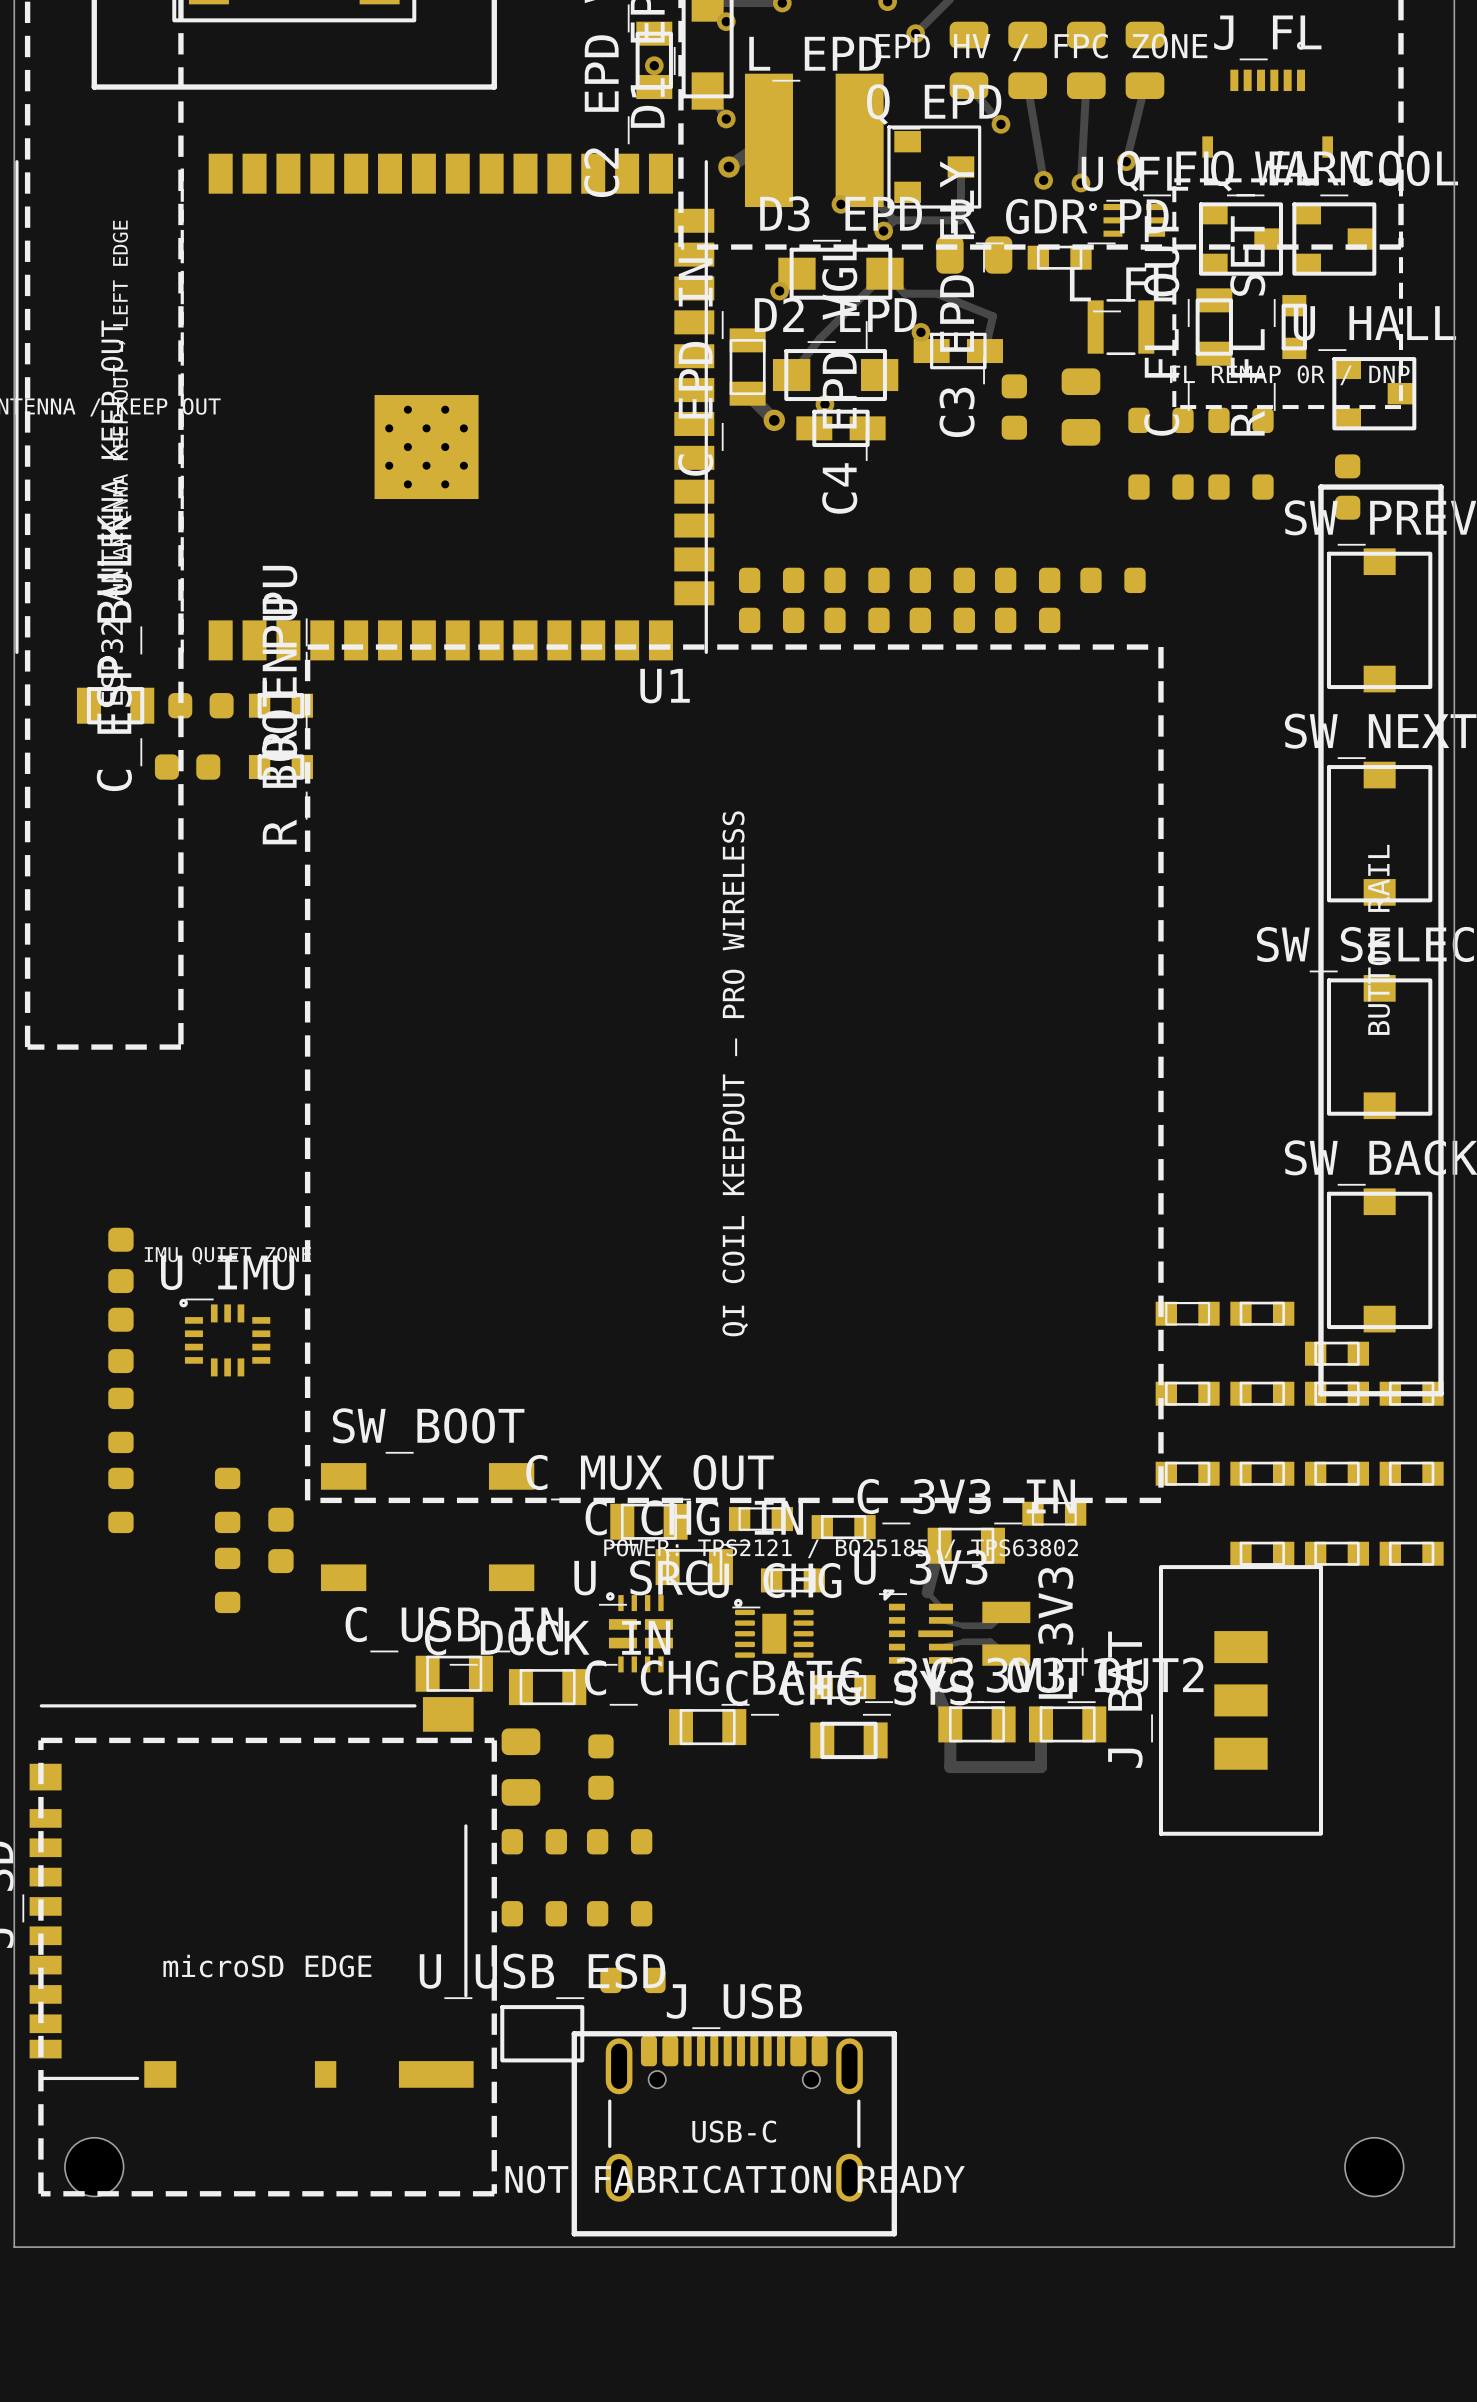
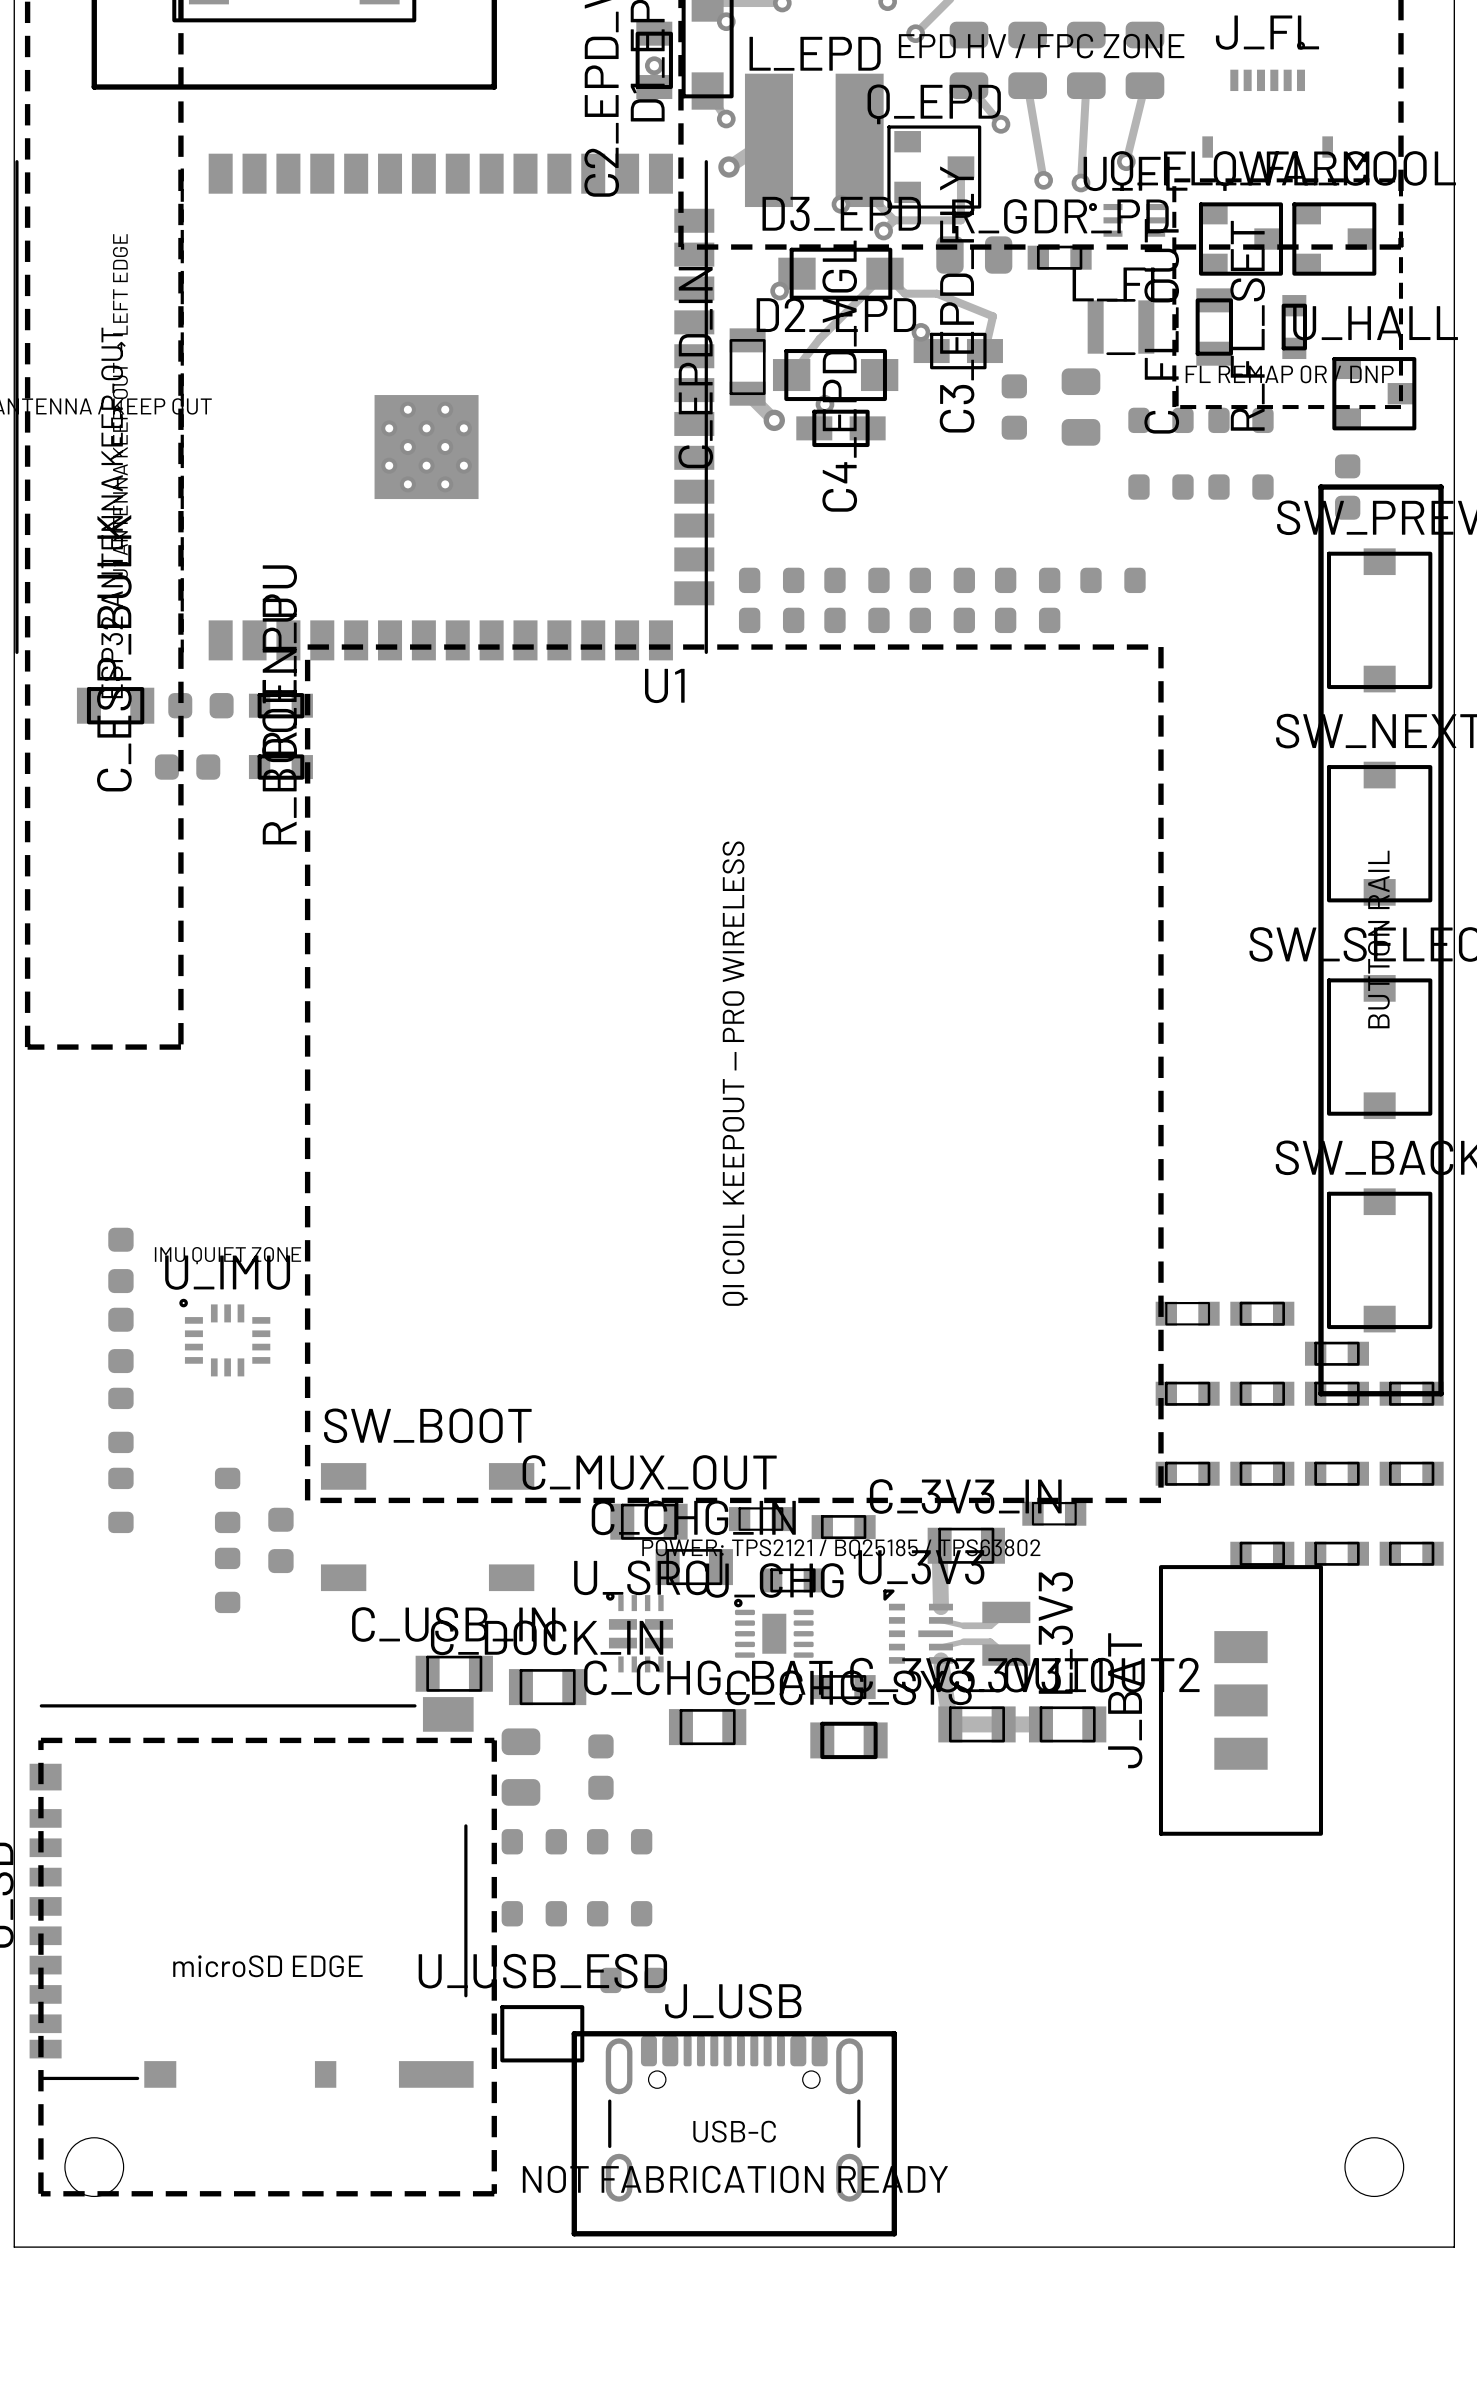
track: (939, 1545) (927, 1592) (940, 1607) -> (939, 1545) (940, 1607)
track: (940, 1660) (930, 1675) (950, 1724) (950, 1767) (1040, 1767) (1040, 1724) -> (940, 1660) (950, 1724) (1040, 1724)

